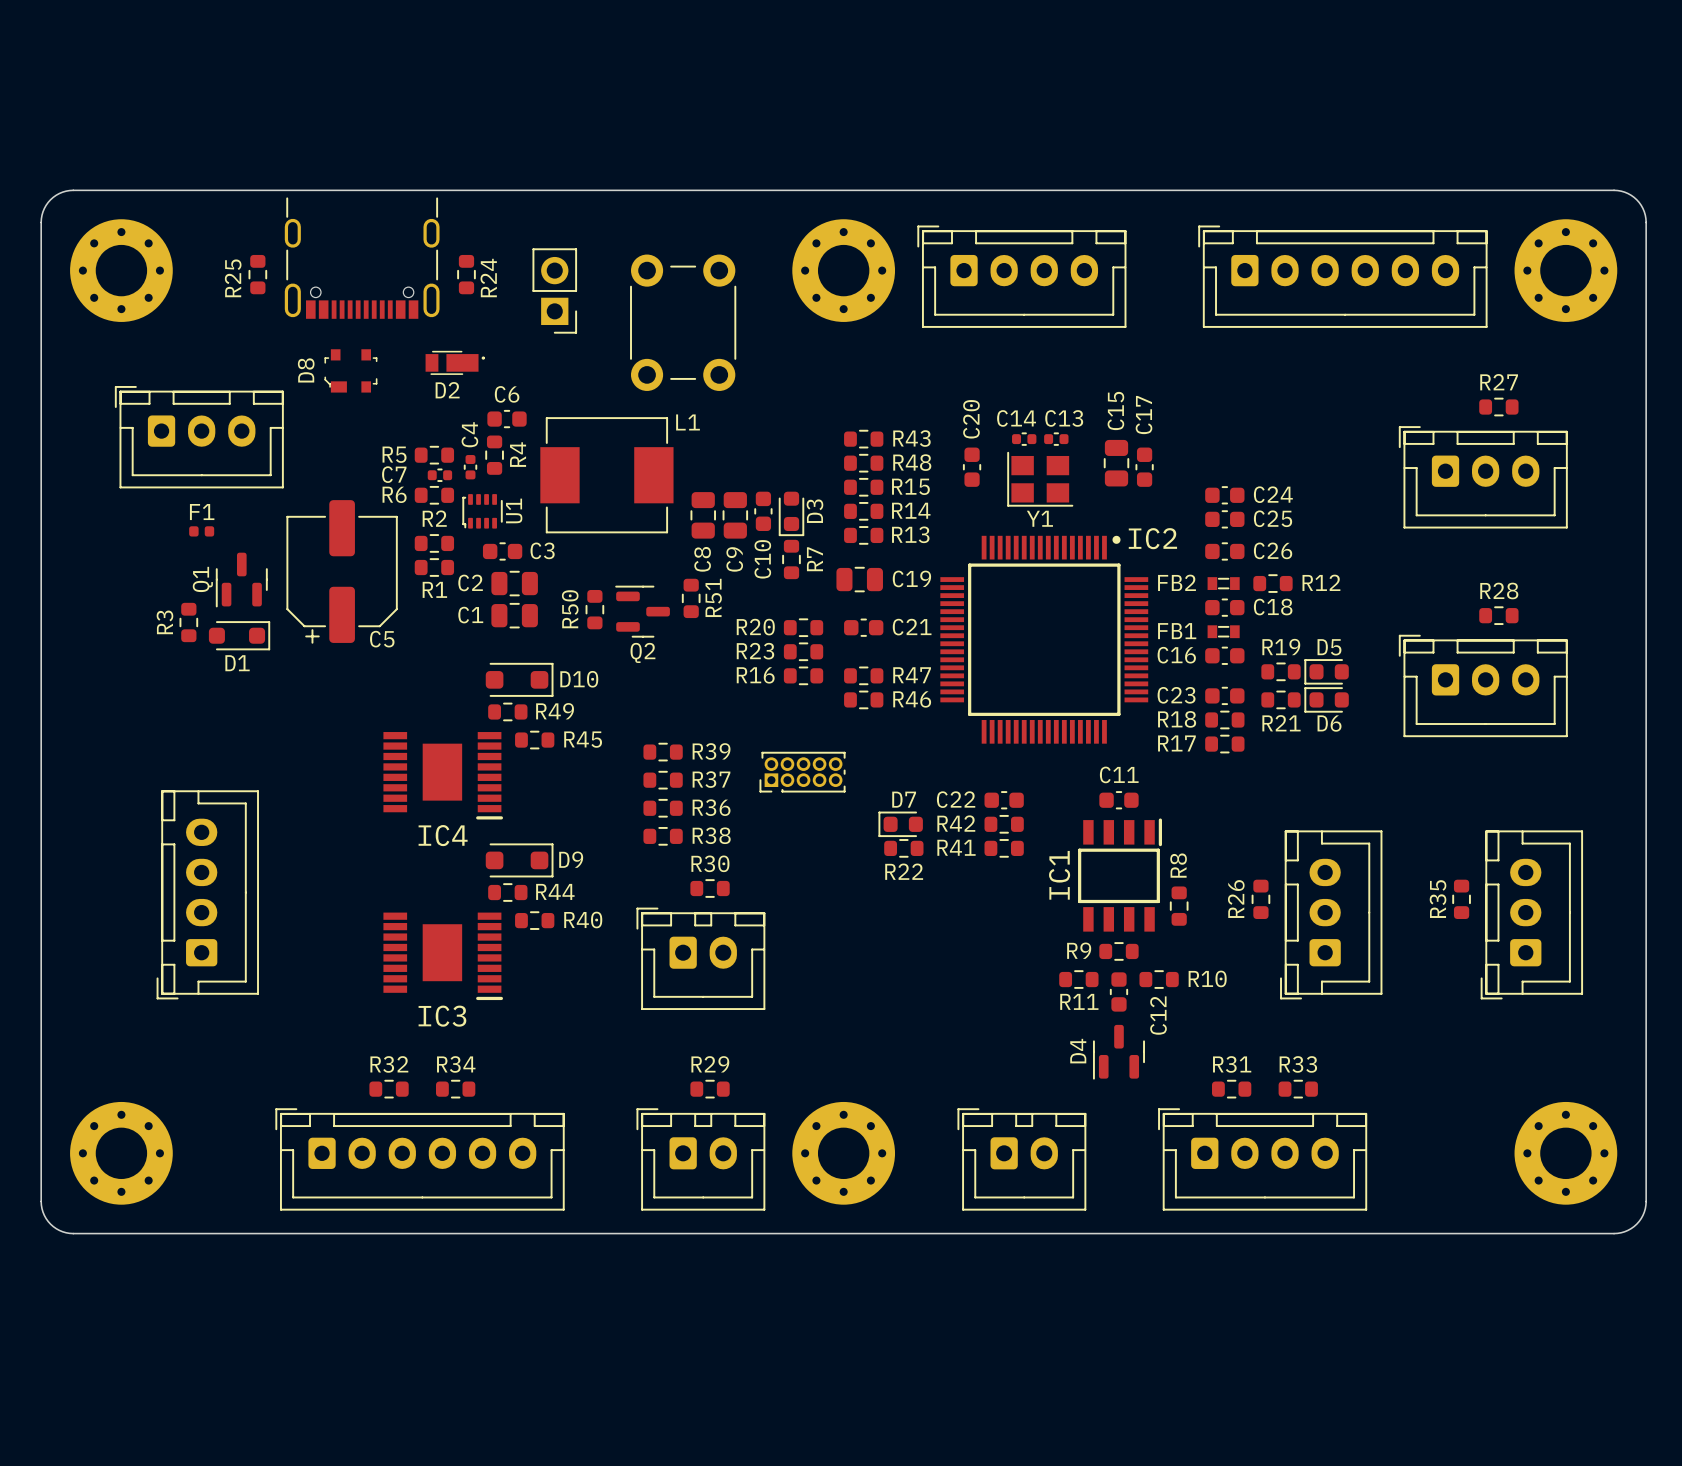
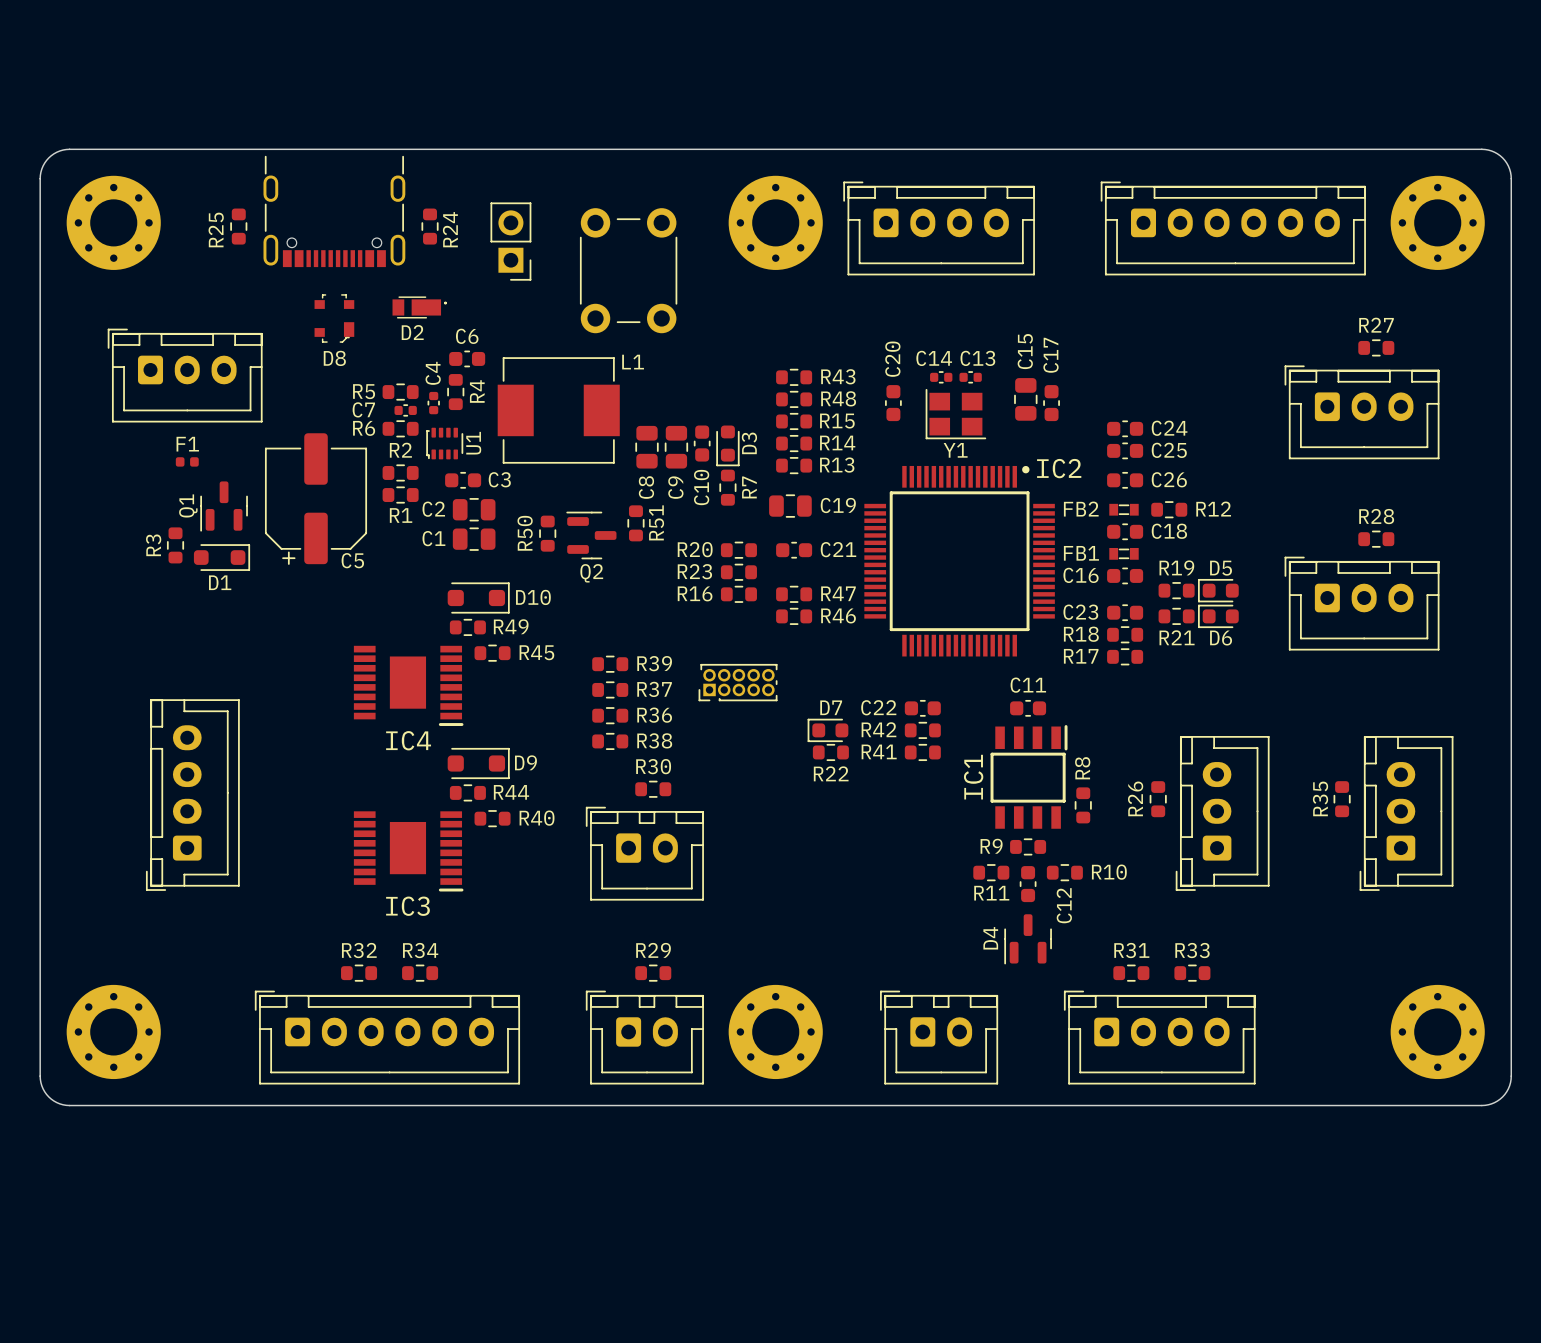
D8 rotation: 0° (350, 370) -> 90° counterclockwise (334, 318)

